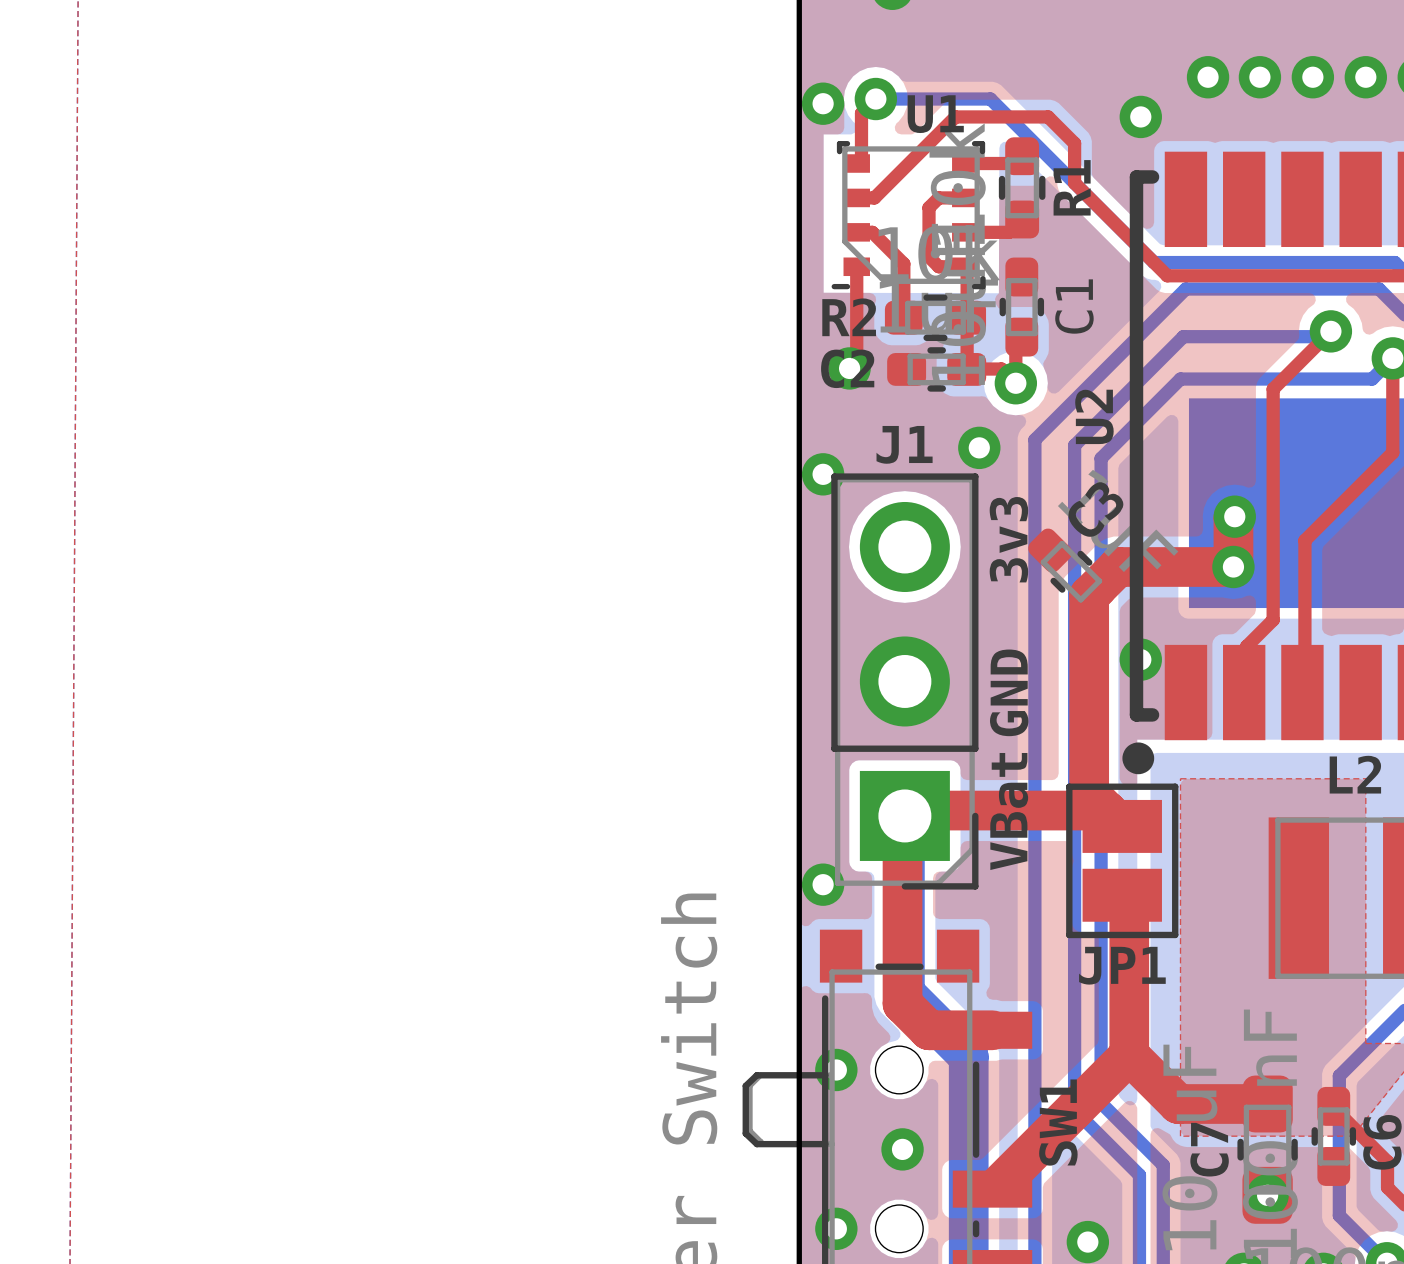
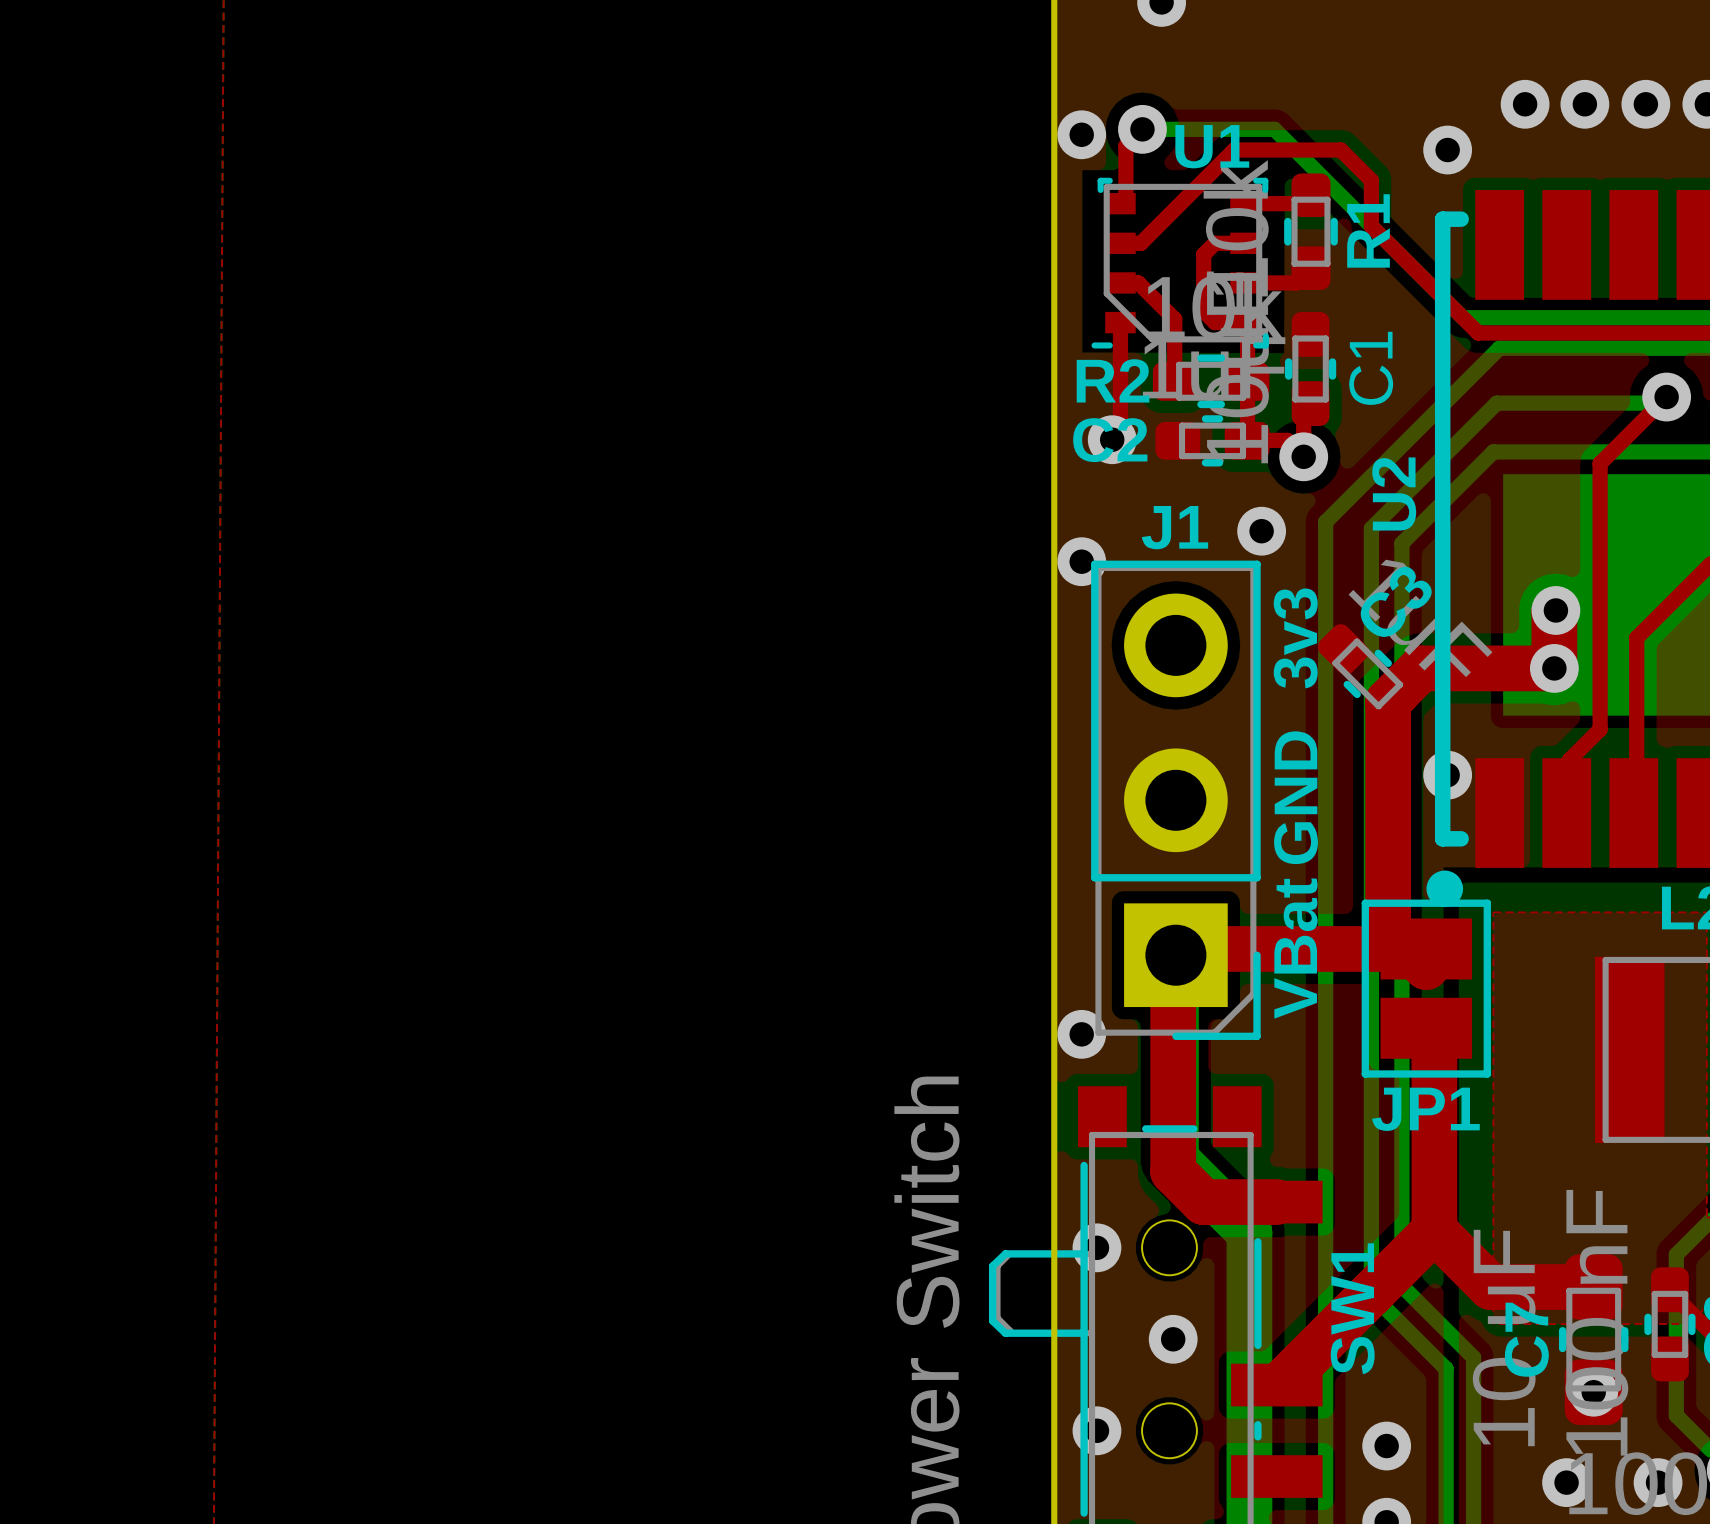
JP1 position: (1122, 860) -> (1426, 988)

